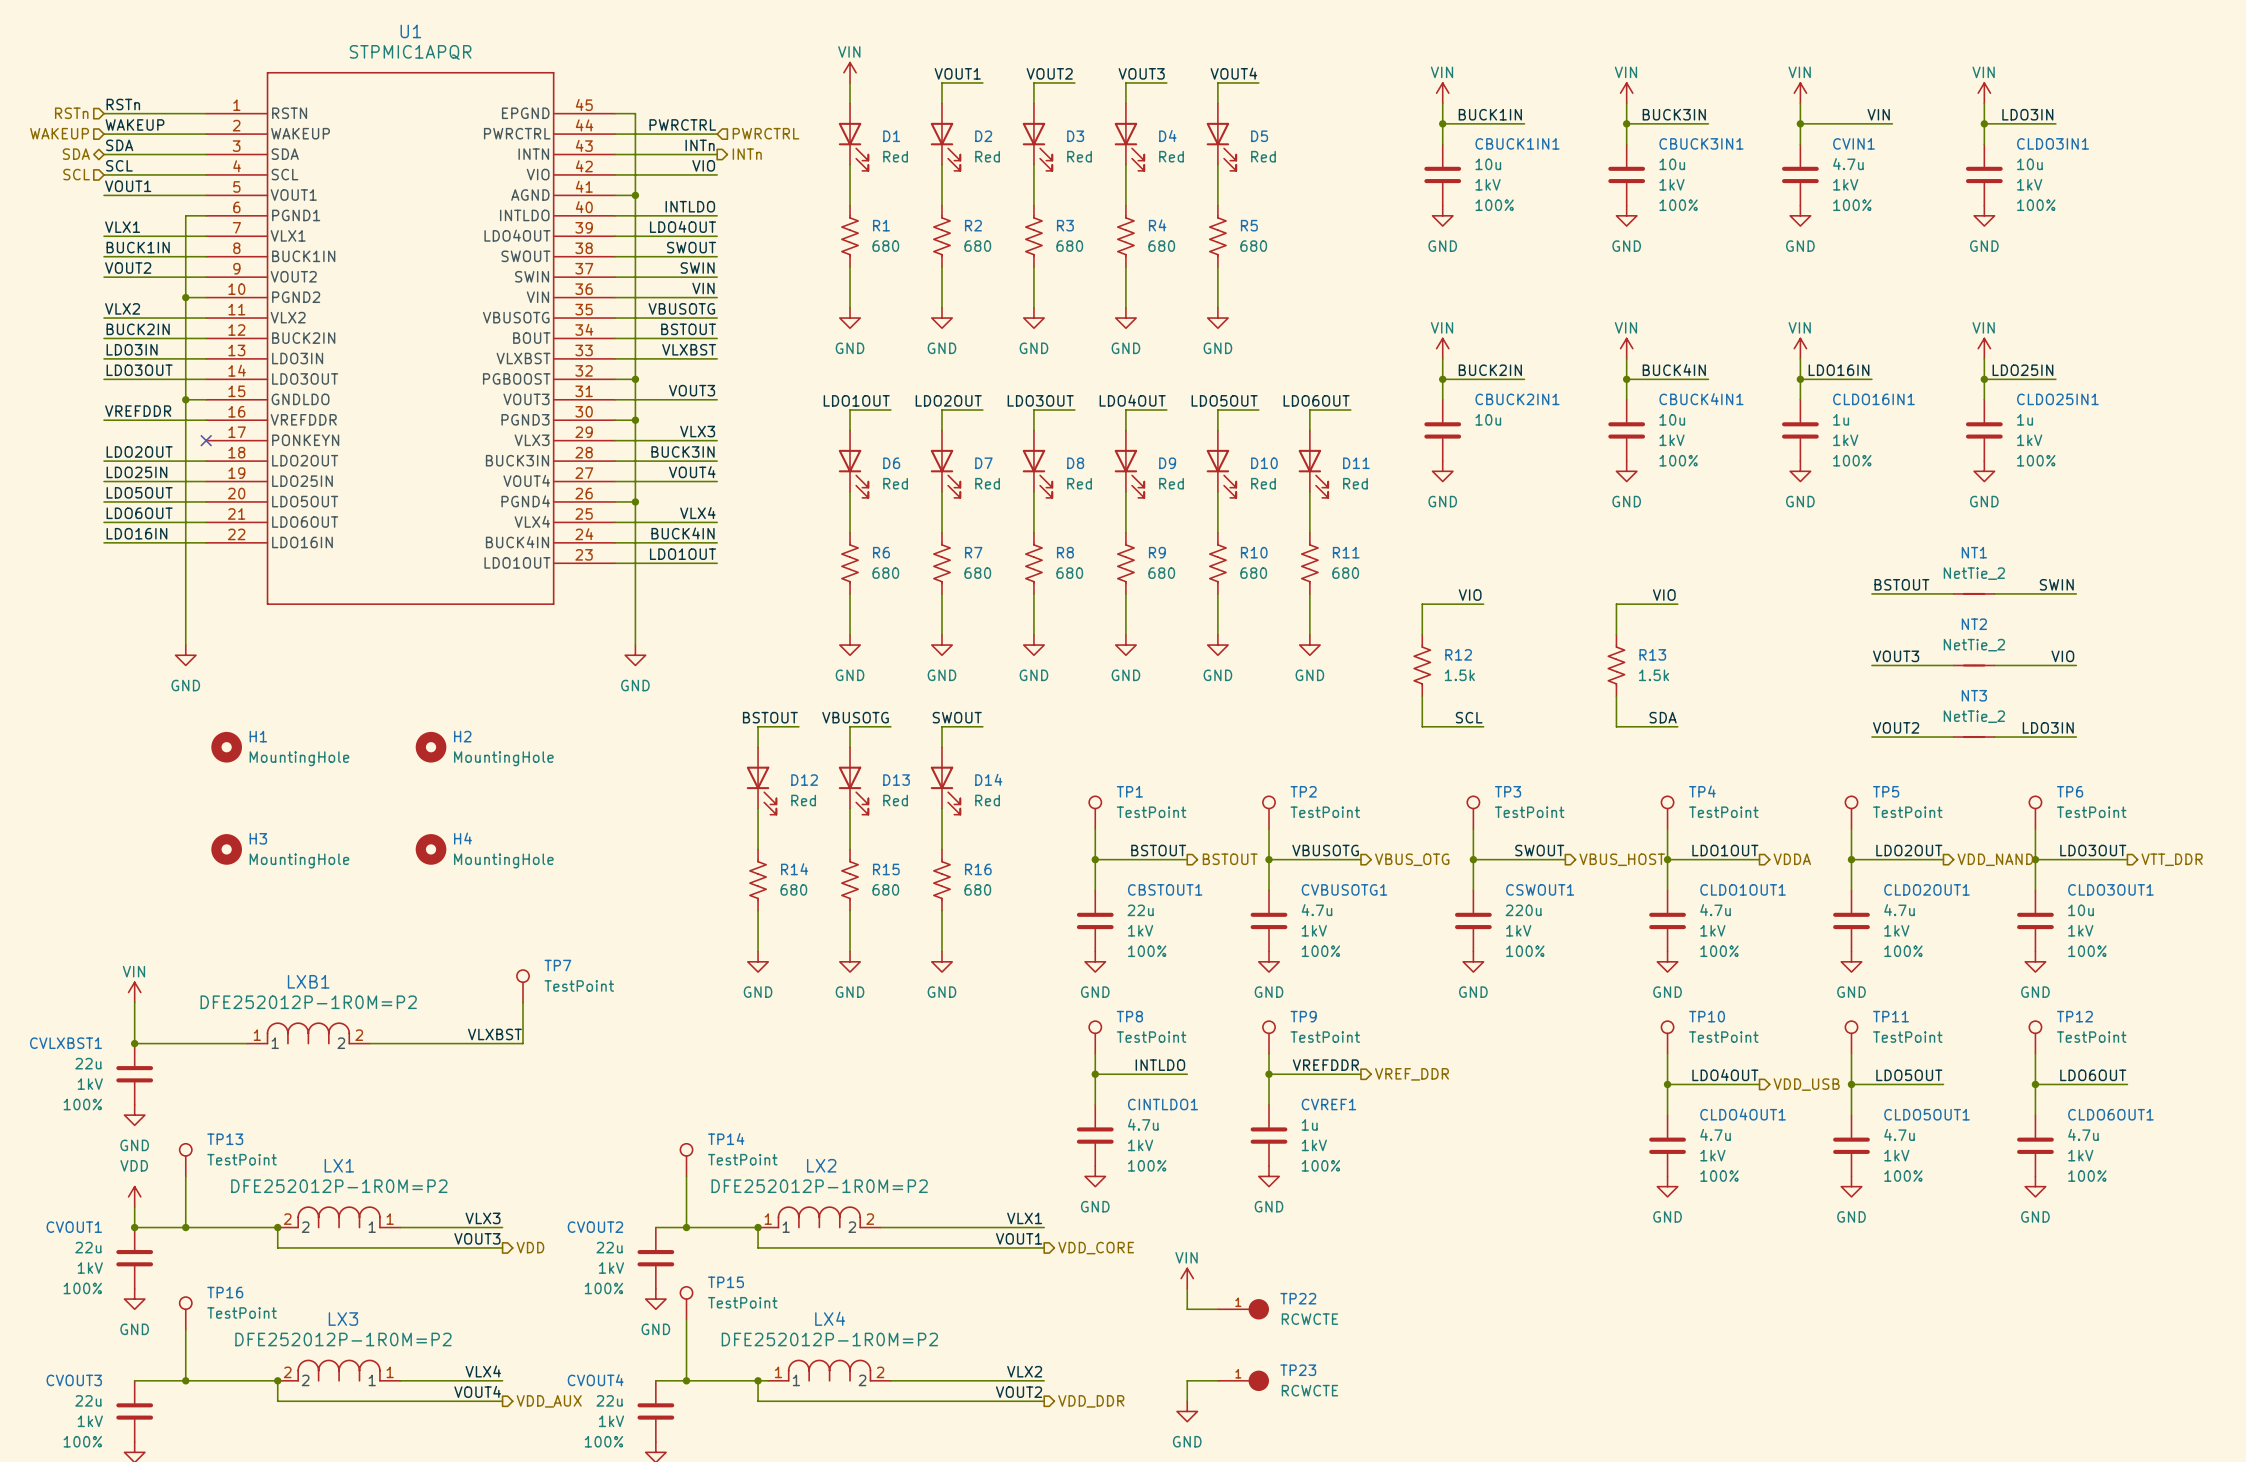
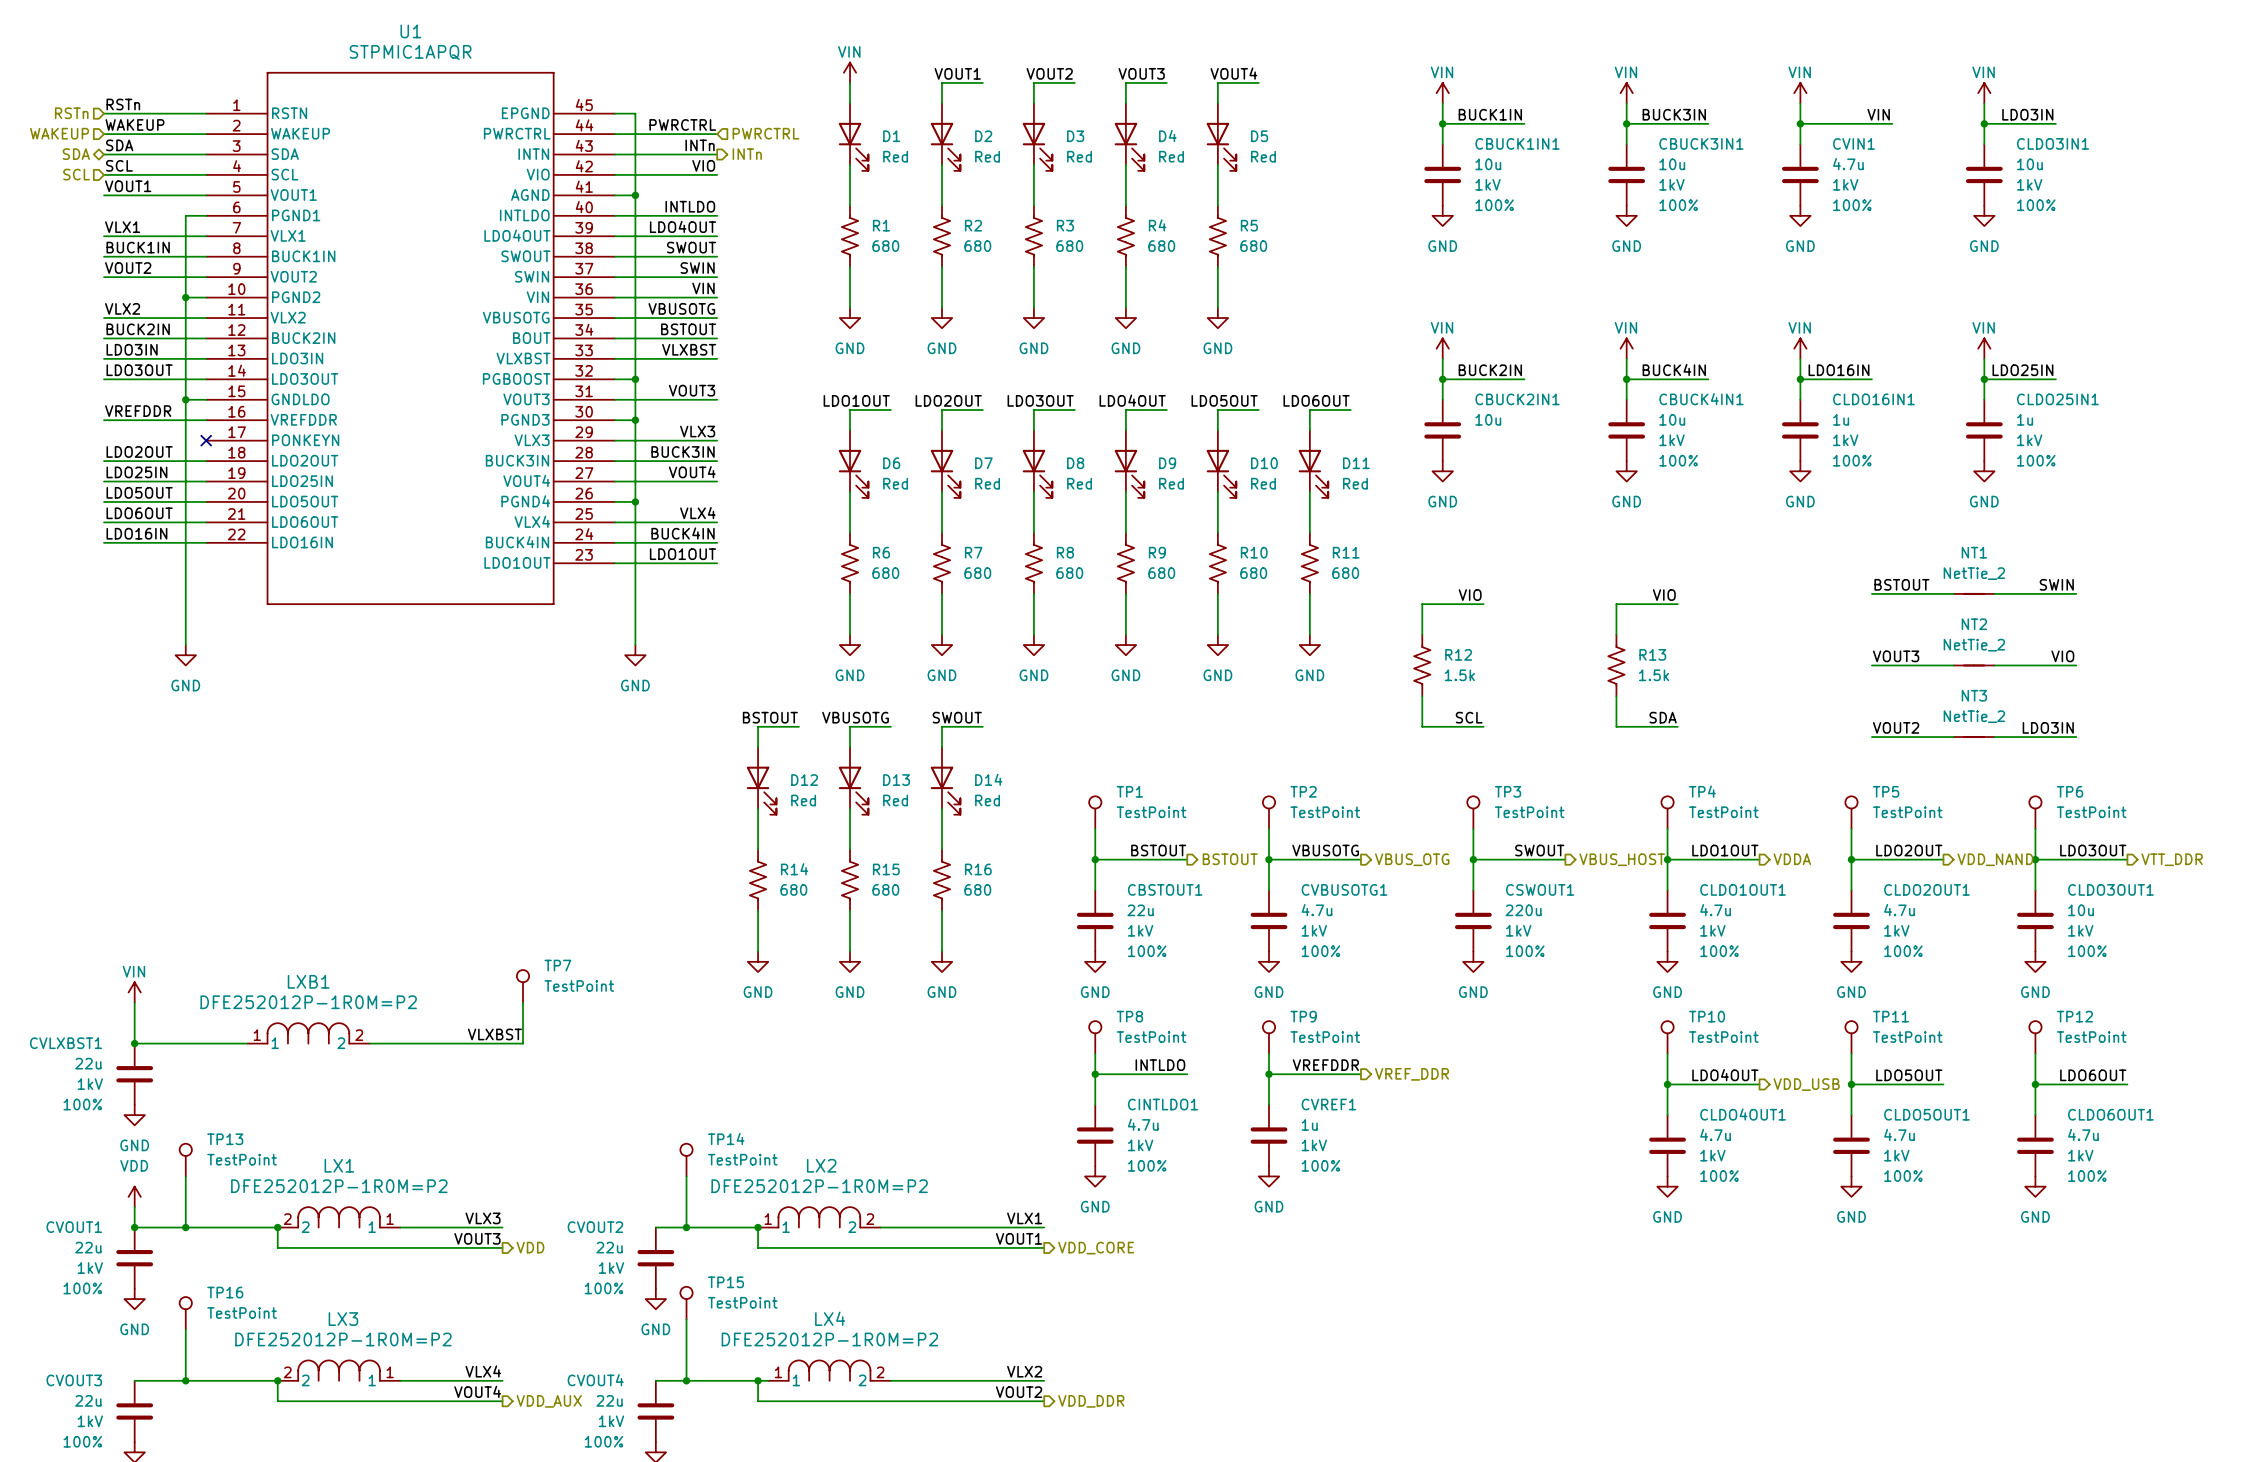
H1: MountingHole (226, 747) -> none
H2: MountingHole (431, 747) -> none
H3: MountingHole (226, 849) -> none
H4: MountingHole (431, 849) -> none
power symbol: VIN (1187, 1278) -> none
wire: (1187, 1288) (1187, 1309) (1217, 1309) -> none
TP22: RCWCTE (1243, 1309) -> none
wire: (1217, 1380) (1187, 1380) (1187, 1401) -> none
TP23: RCWCTE (1243, 1380) -> none
power symbol: GND (1187, 1411) -> none

